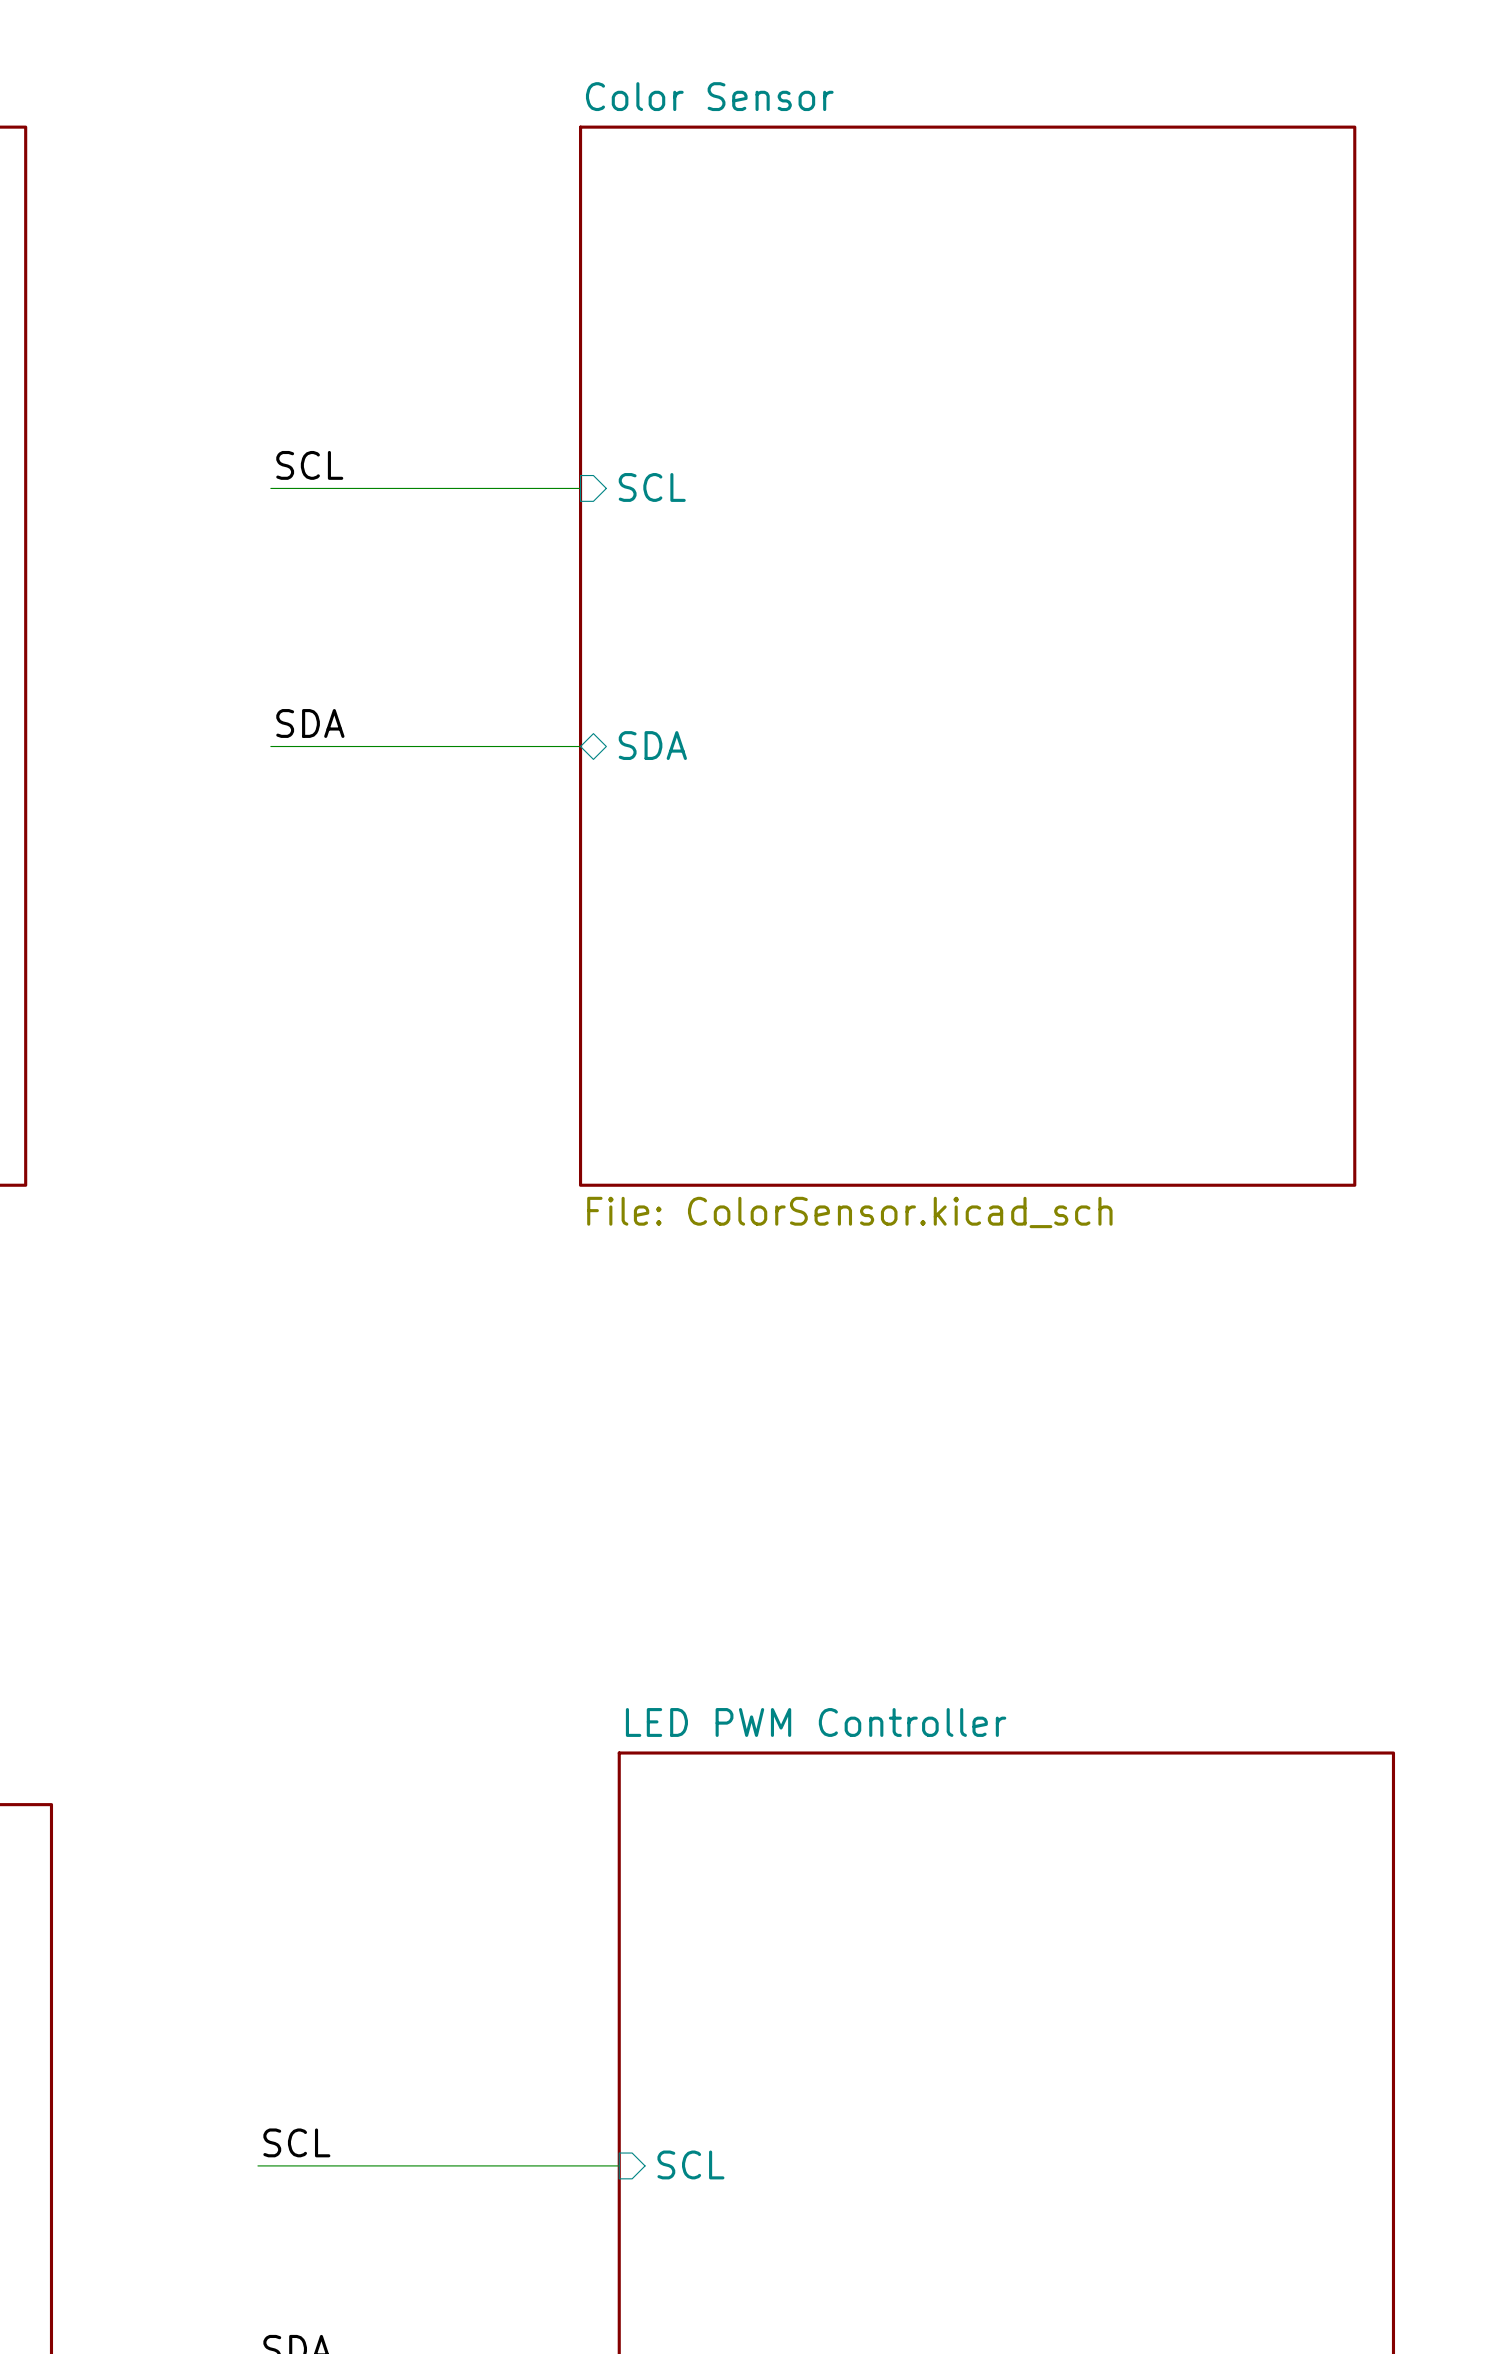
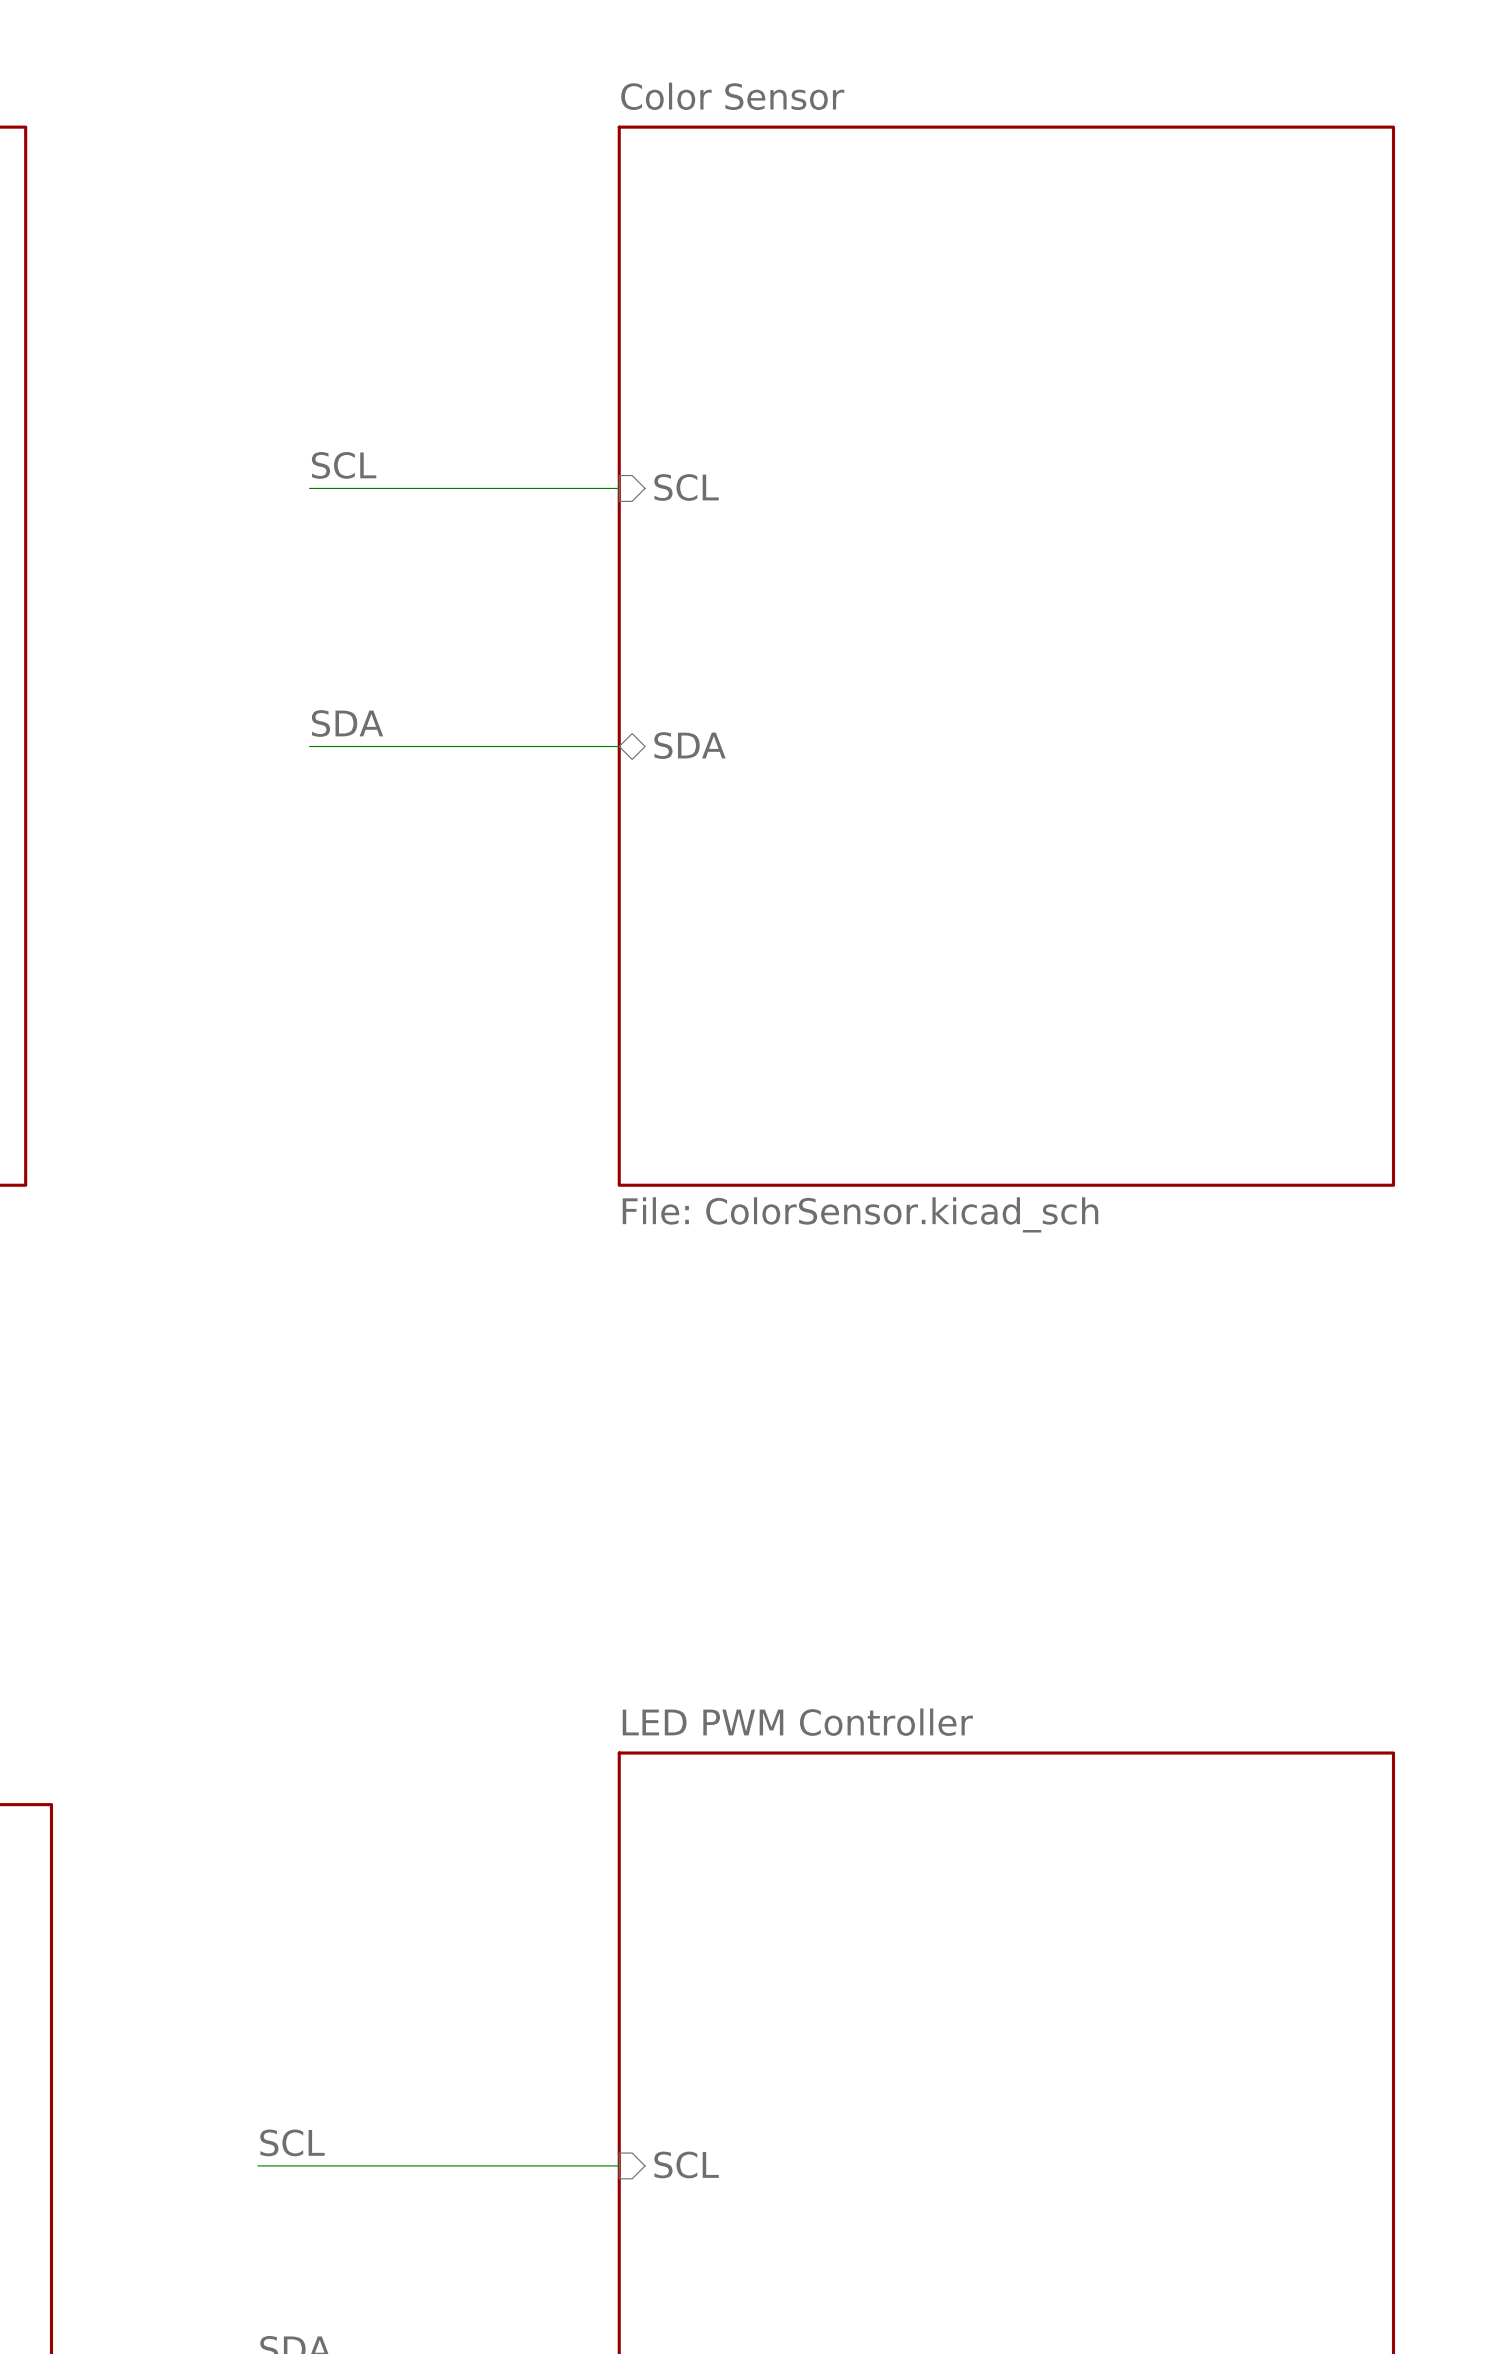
label position: SCL (309, 465) -> SCL (344, 465)
sheet pin position: SCL (652, 487) -> SCL (686, 487)
wire: (270, 488) (309, 488) -> (580, 488) (619, 488)
sheet Color Sensor position: (967, 656) -> (1006, 656)
label position: SDA (310, 723) -> SDA (347, 723)
sheet pin position: SDA (652, 745) -> SDA (690, 745)
wire: (270, 746) (309, 746) -> (580, 746) (619, 746)

